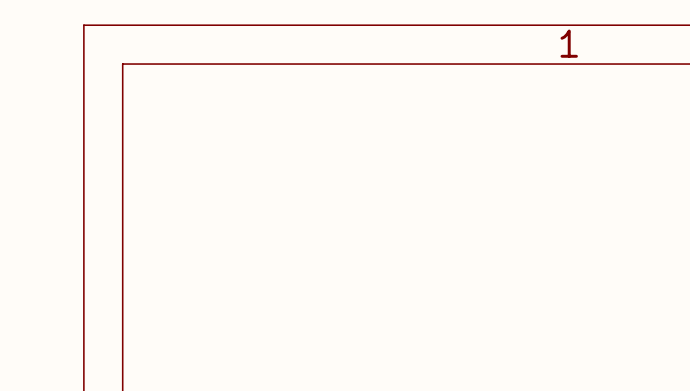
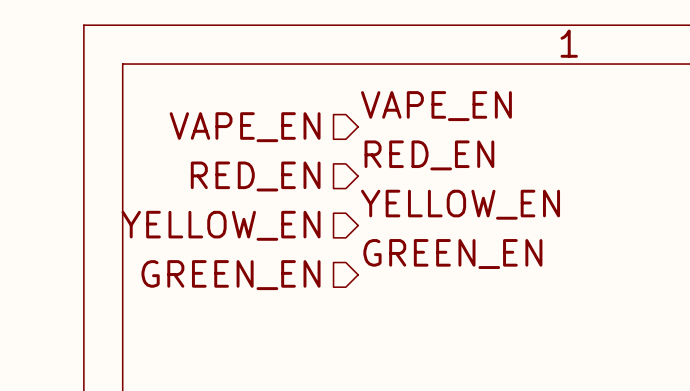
label: none -> VAPE_EN (436, 106)
hierarchical label: none -> VAPE_EN (245, 127)
label: none -> RED_EN (429, 155)
hierarchical label: none -> RED_EN (255, 176)
label: none -> YELLOW_EN (460, 204)
hierarchical label: none -> YELLOW_EN (221, 225)
label: none -> GREEN_EN (452, 254)
hierarchical label: none -> GREEN_EN (231, 275)

